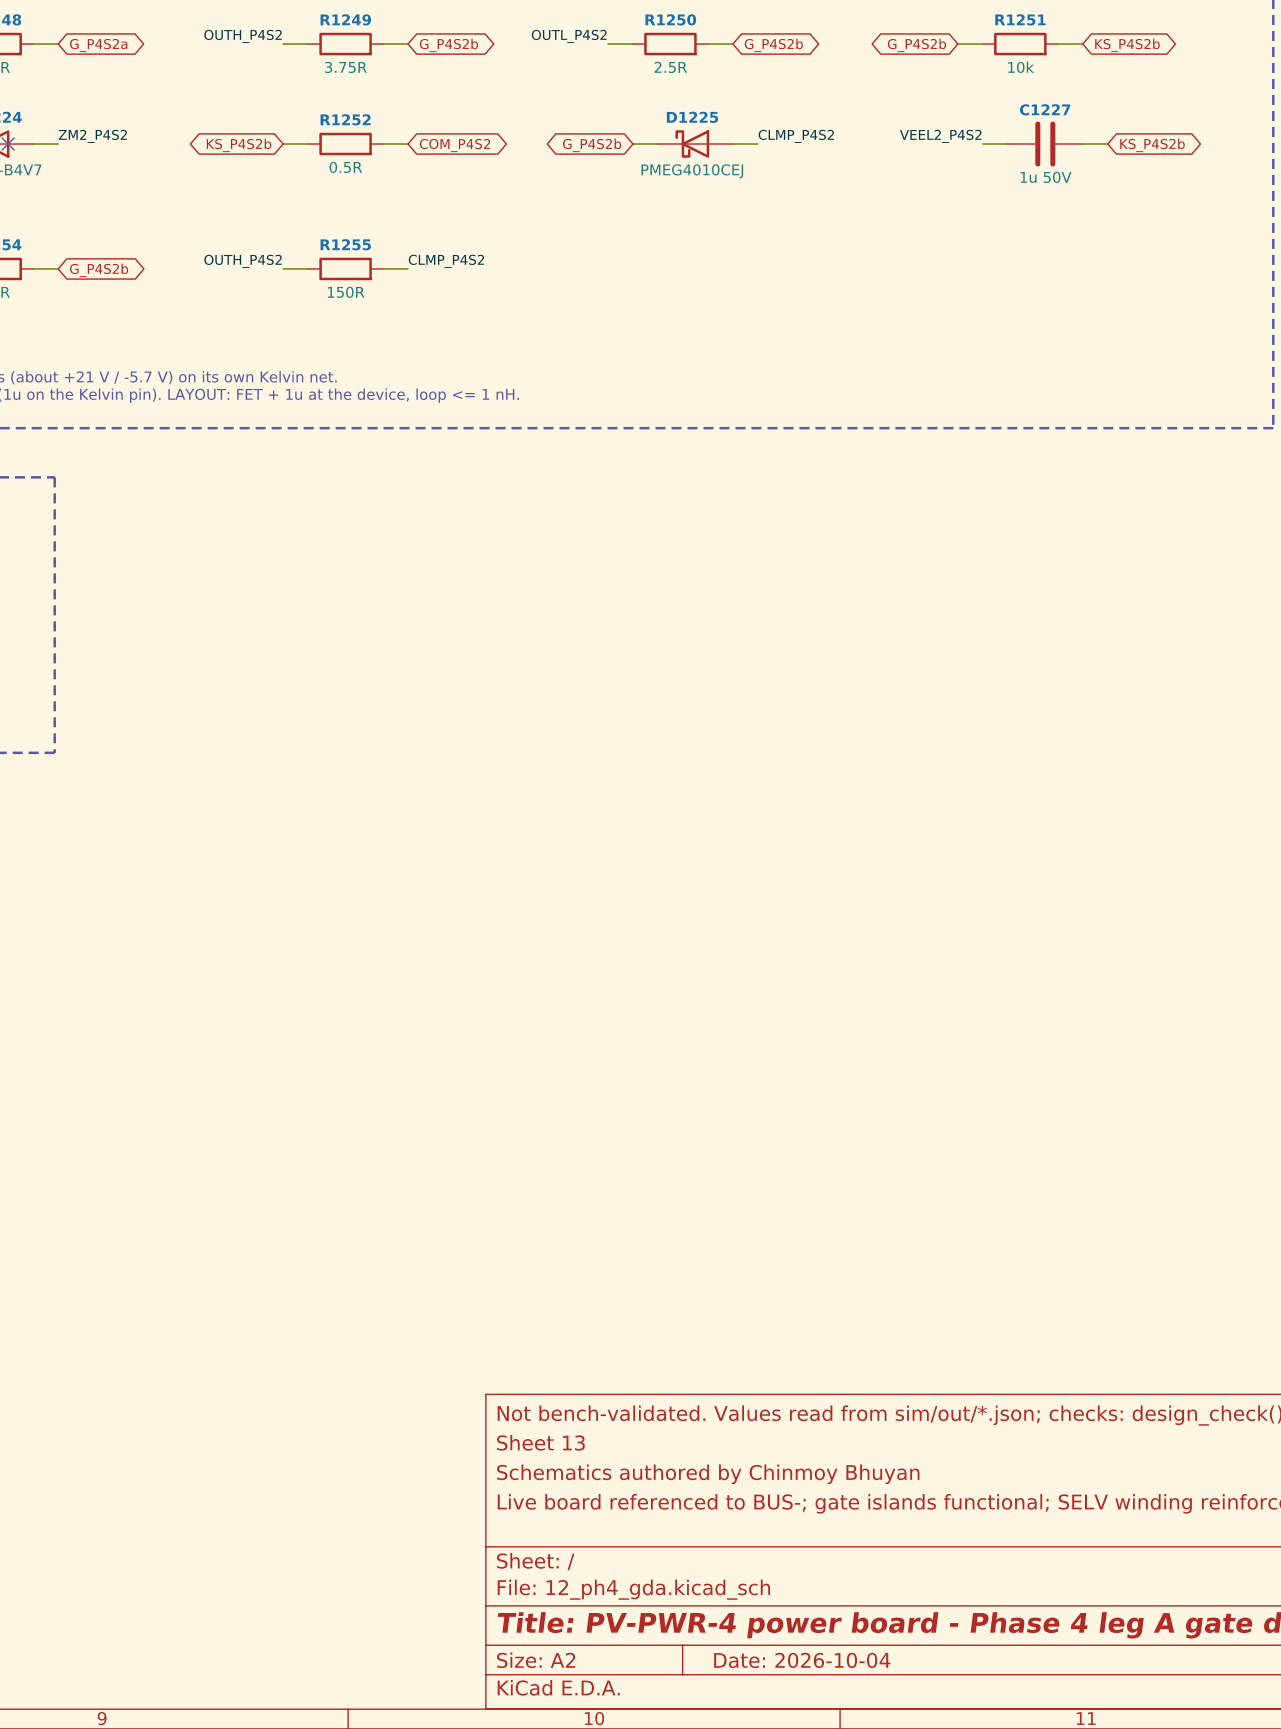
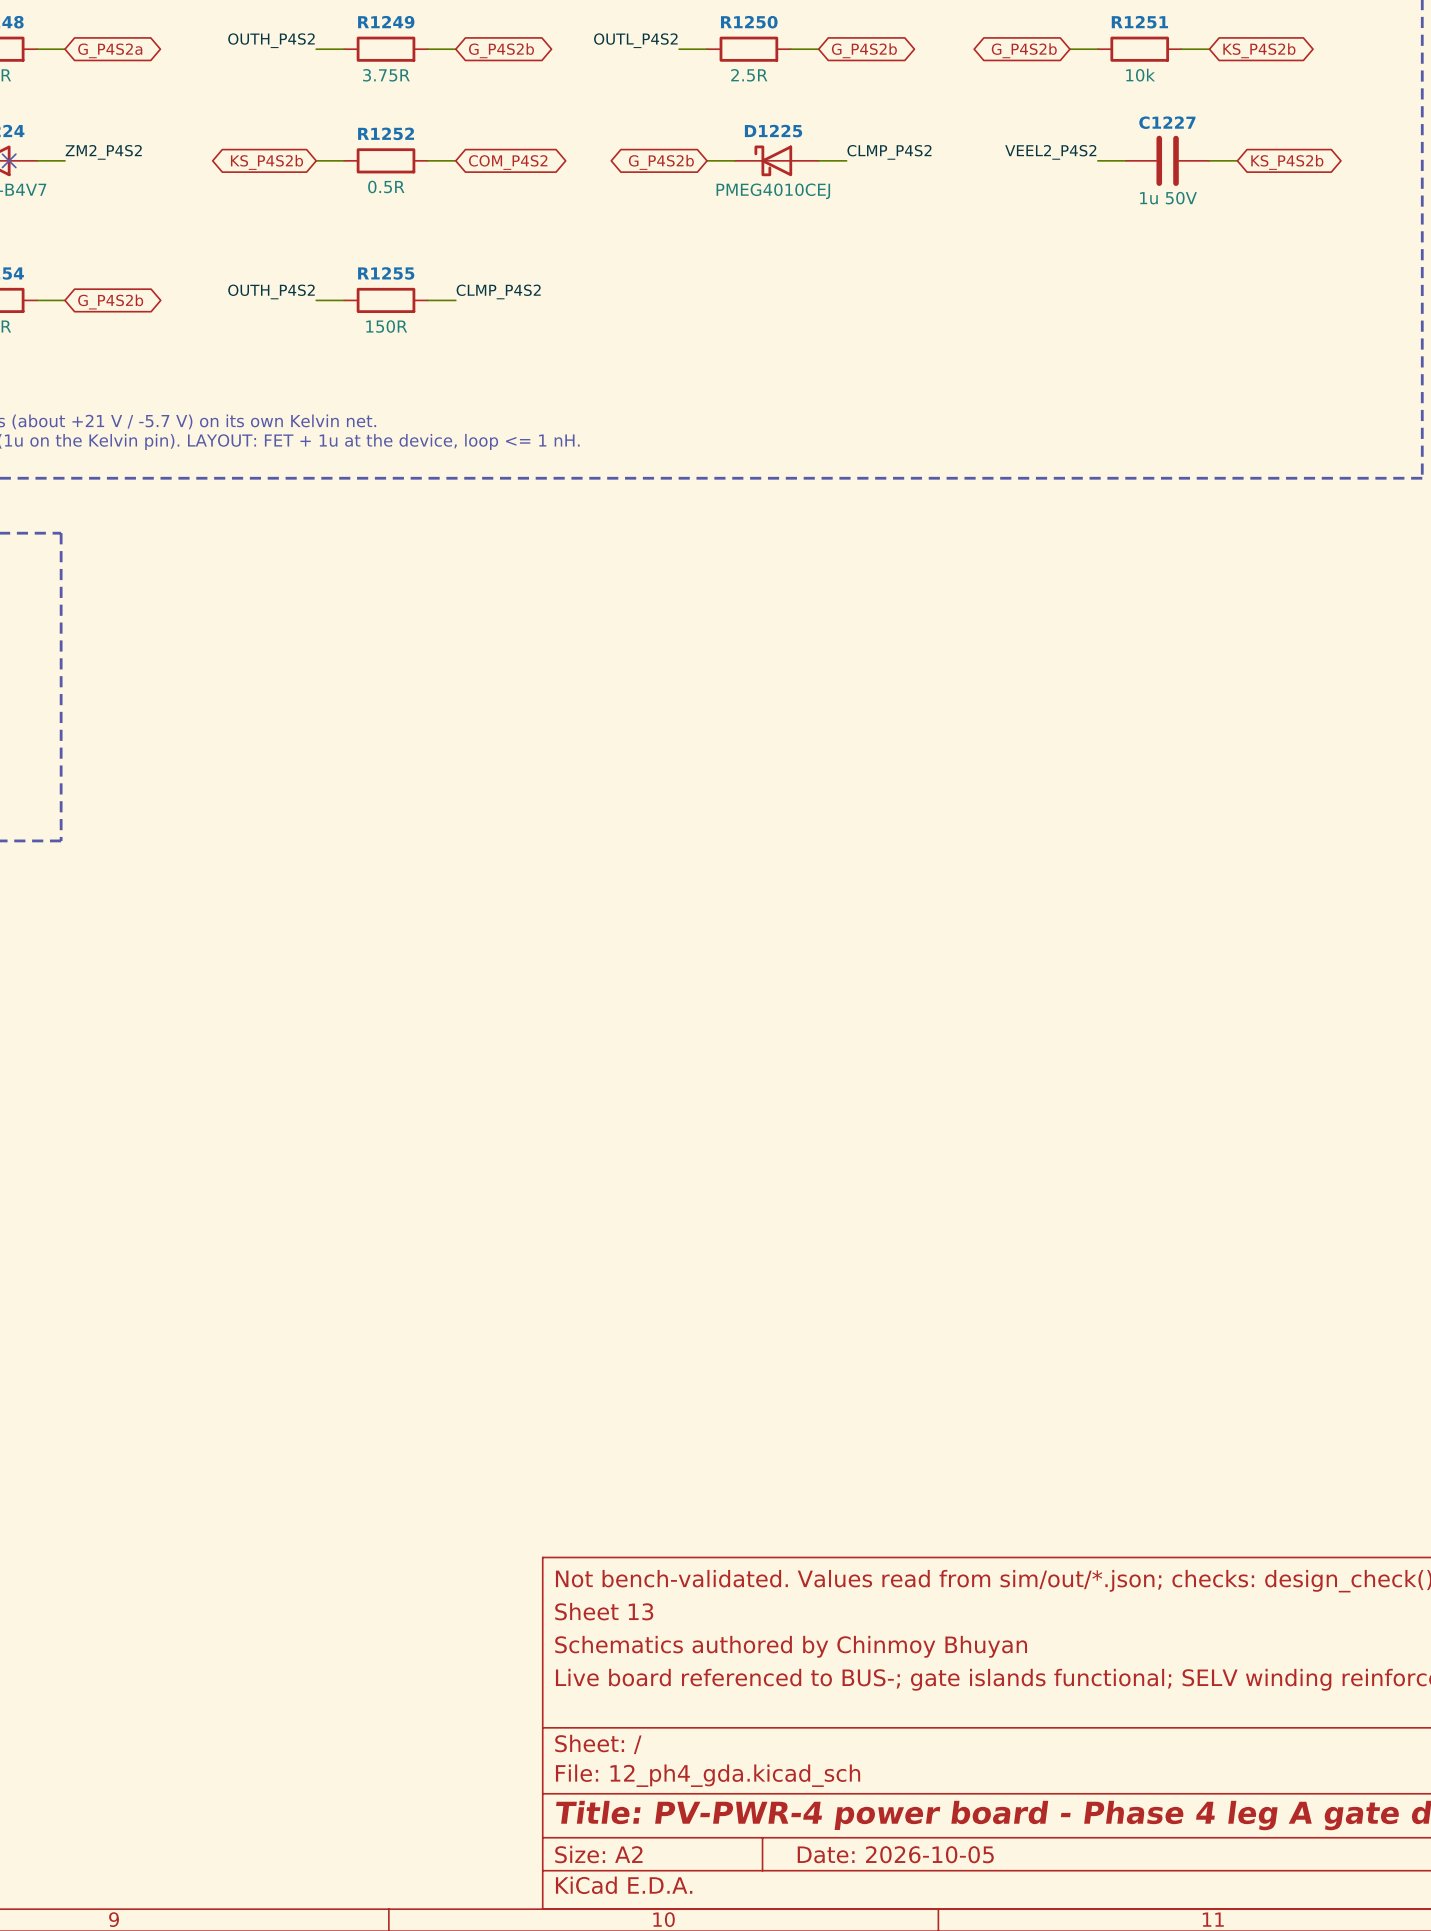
title block: Date: 2026-10-04 (802, 1660) -> Date: 2026-10-05 (895, 1854)

